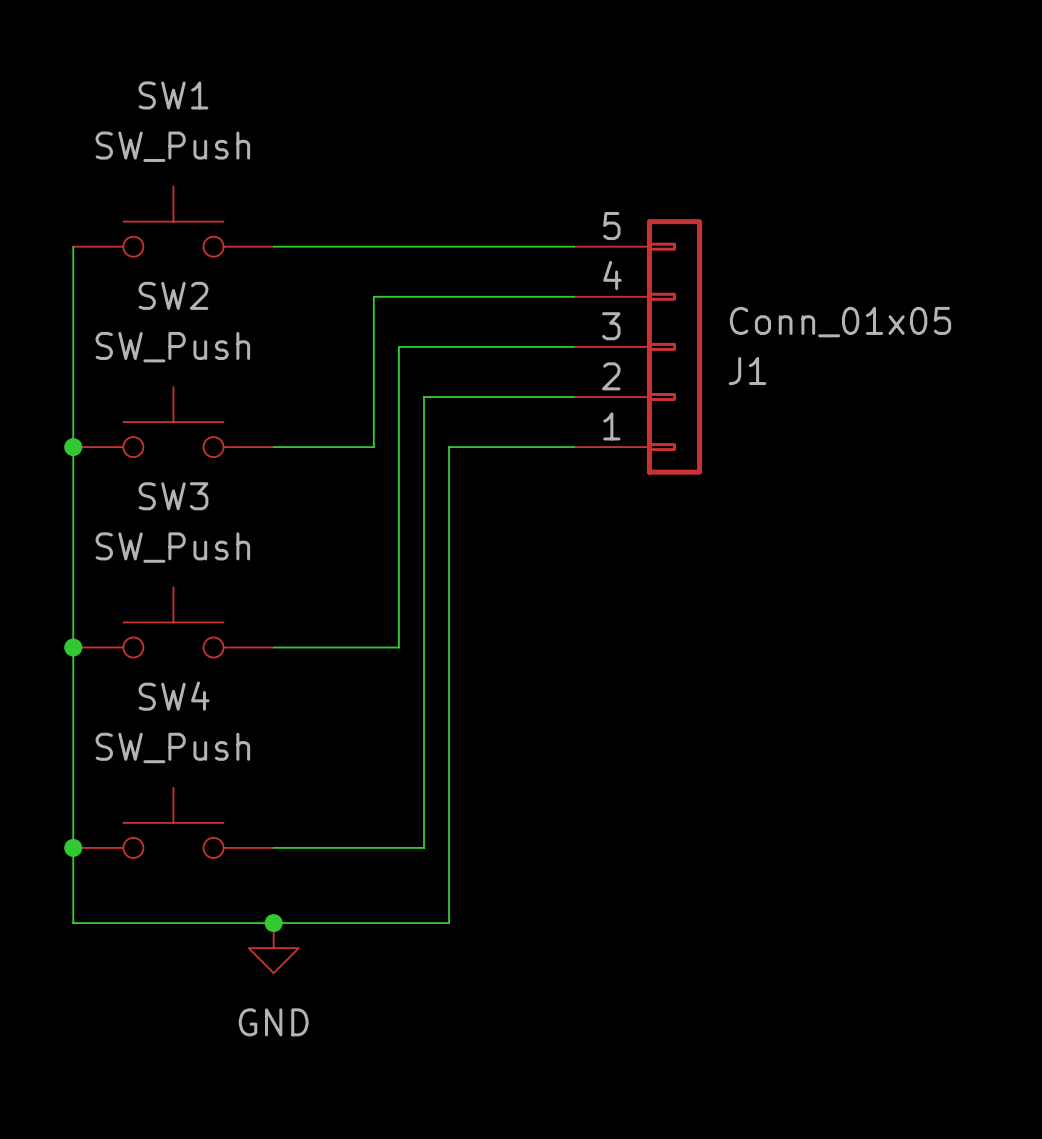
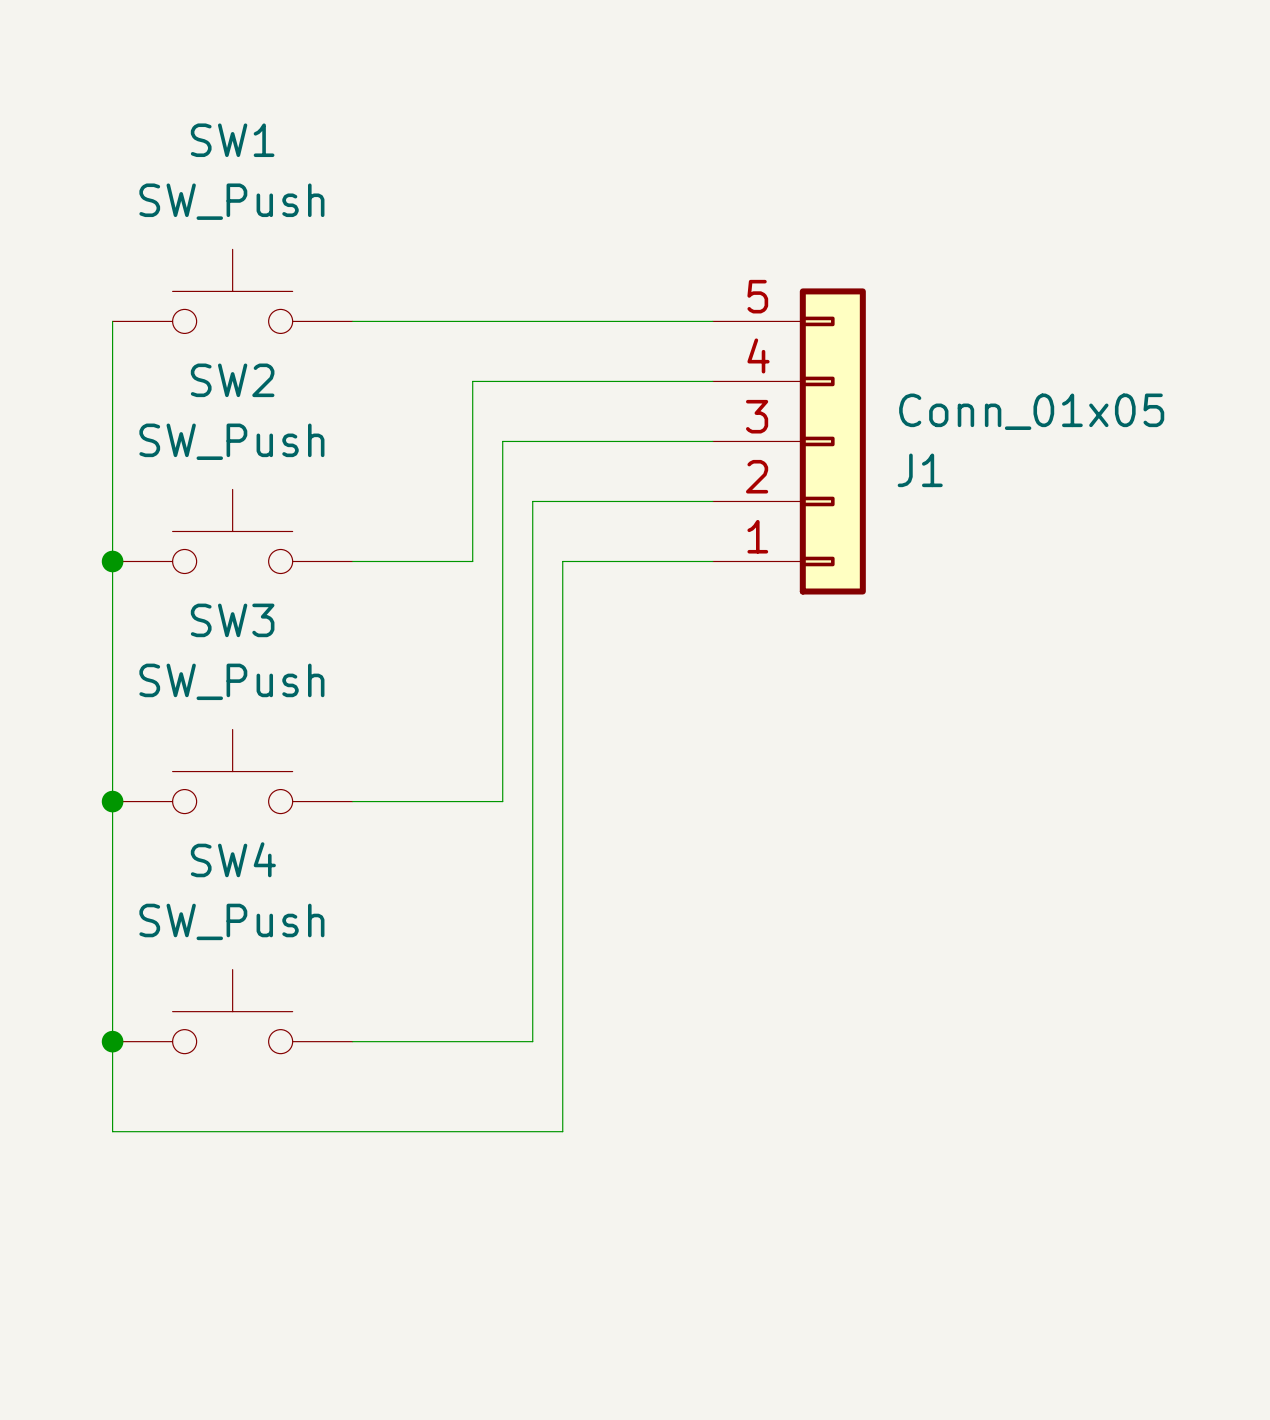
junction: (273, 923) -> none
power symbol: GND (273, 948) -> none

